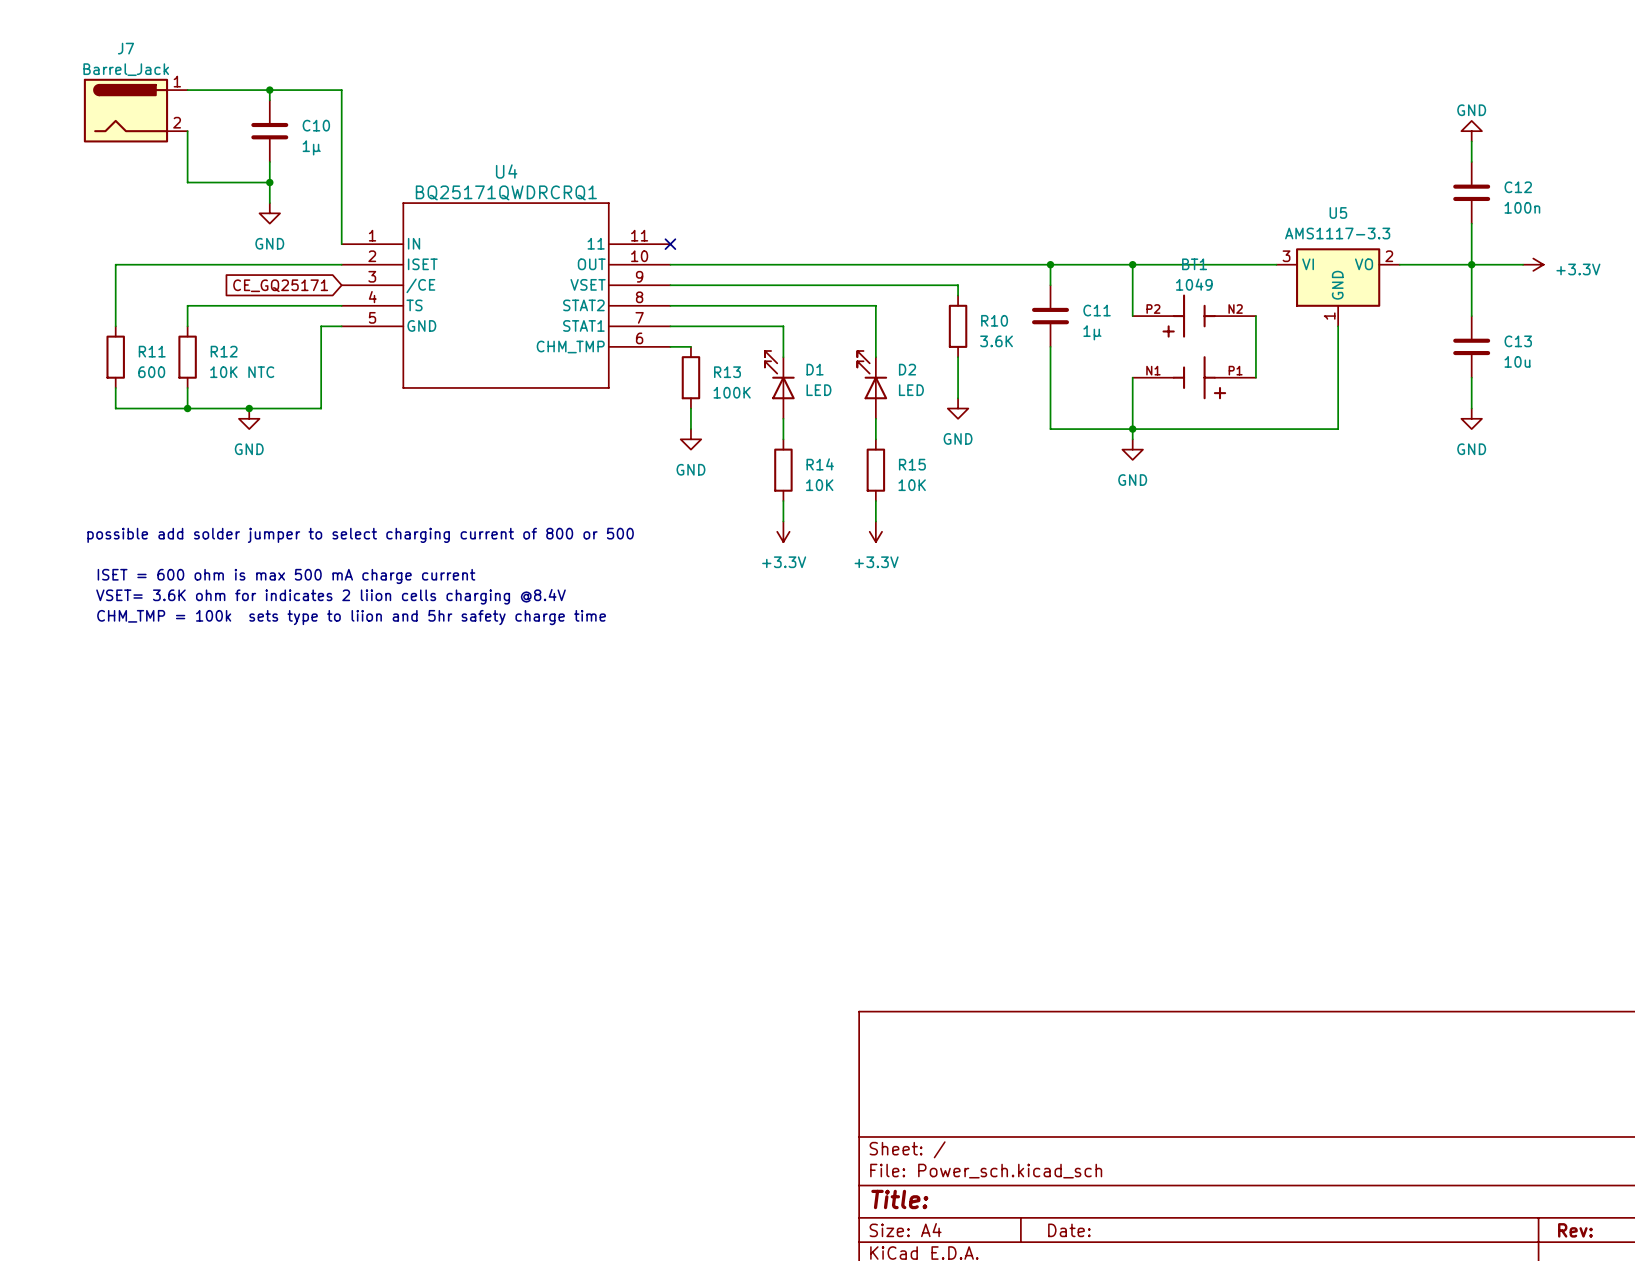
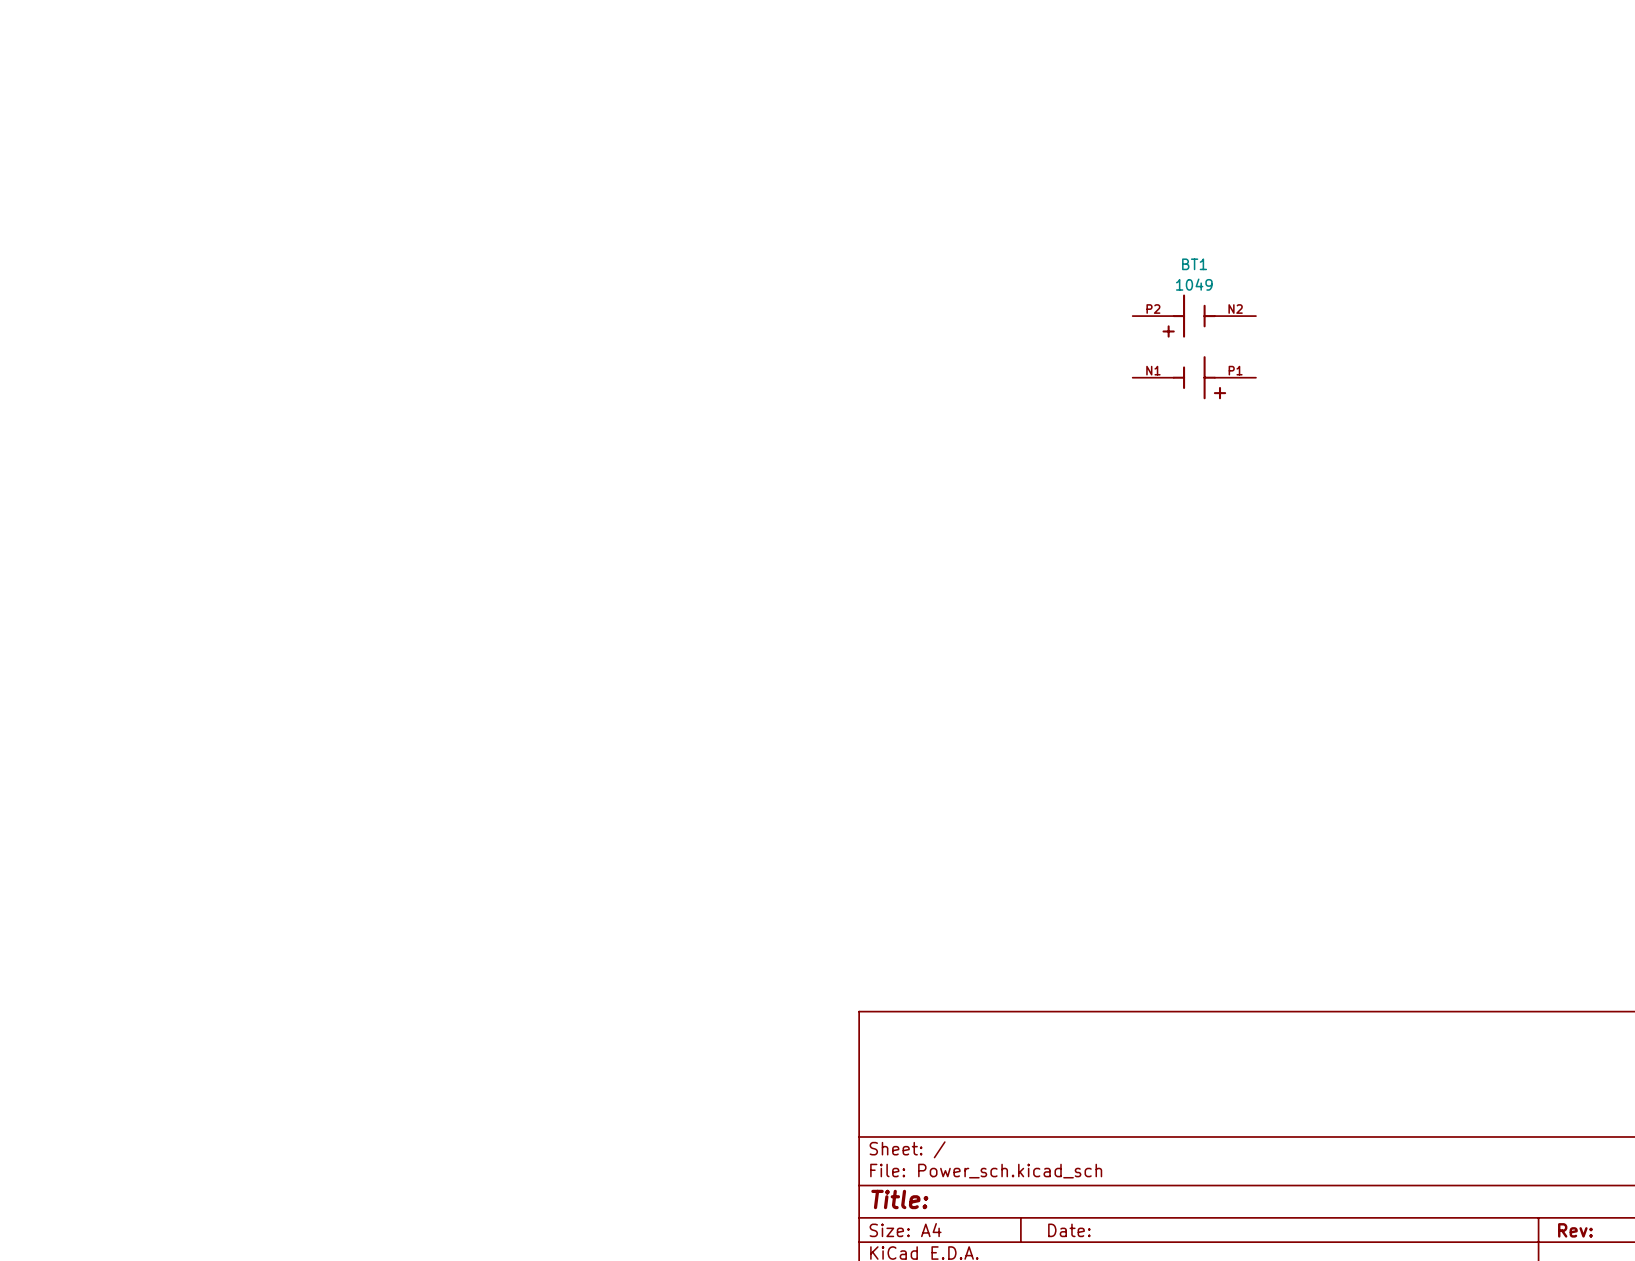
wire: (187, 90) (341, 90) (341, 244) -> none
wire: (269, 90) (269, 100) -> none
junction: (269, 90) -> none
J7: Barrel_Jack (135, 110) -> none
wire: (187, 131) (187, 182) (269, 182) -> none
C10: 1µ (269, 131) -> none
power symbol: GND (1471, 131) -> none
wire: (1471, 141) (1471, 161) -> none
wire: (269, 161) (269, 203) -> none
junction: (269, 182) -> none
C12: 100n (1471, 192) -> none
power symbol: GND (269, 213) -> none
wire: (1471, 223) (1471, 316) -> none
no-connect mark: (670, 244) -> none
wire: (341, 264) (115, 264) (115, 326) -> none
wire: (670, 264) (1276, 264) -> none
wire: (1050, 264) (1050, 285) -> none
junction: (1050, 264) -> none
wire: (1132, 264) (1132, 316) -> none
junction: (1132, 264) -> none
wire: (1399, 264) (1523, 264) -> none
junction: (1471, 264) -> none
power symbol: +3.3V (1533, 264) -> none
global label: CE_GQ25171 (280, 285) -> none
wire: (670, 285) (958, 285) (958, 295) -> none
U5: AMS1117-3.3 (1338, 287) -> none
U4: BQ25171QWDRCRQ1 (506, 295) -> none
wire: (341, 305) (187, 305) (187, 326) -> none
wire: (670, 305) (875, 305) (875, 357) -> none
C11: 1µ (1050, 316) -> none
wire: (1255, 316) (1255, 377) -> none
wire: (341, 326) (321, 326) (321, 408) (115, 408) (115, 387) -> none
wire: (670, 326) (783, 326) (783, 357) -> none
R10: 3.6K (958, 326) -> none
wire: (1338, 326) (1338, 429) (1050, 429) (1050, 346) -> none
wire: (670, 346) (690, 346) -> none
C13: 10u (1471, 346) -> none
R11: 600 (115, 357) -> none
R12: 10K NTC (187, 357) -> none
wire: (958, 357) (958, 398) -> none
R13: 100K (690, 377) -> none
wire: (1132, 377) (1132, 439) -> none
wire: (1471, 377) (1471, 408) -> none
D1: LED (779, 384) -> none
D2: LED (872, 384) -> none
wire: (187, 387) (187, 408) -> none
junction: (187, 408) -> none
junction: (249, 408) -> none
wire: (690, 408) (690, 429) -> none
power symbol: GND (958, 408) -> none
power symbol: GND (249, 418) -> none
wire: (783, 418) (783, 439) -> none
wire: (875, 418) (875, 439) -> none
power symbol: GND (1471, 418) -> none
junction: (1132, 429) -> none
power symbol: GND (690, 439) -> none
power symbol: GND (1132, 449) -> none
R14: 10K (783, 470) -> none
R15: 10K (875, 470) -> none
wire: (783, 500) (783, 521) -> none
wire: (875, 500) (875, 521) -> none
power symbol: +3.3V (783, 531) -> none
power symbol: +3.3V (875, 531) -> none
text: possible add solder jumper to select charging current of 800 or 500 (360, 535) -> none
text: ISET = 600 ohm is max 500 mA charge current (286, 576) -> none
text: VSET= 3.6K ohm for indicates 2 liion cells charging @8.4V (331, 596) -> none
text: CHM_TMP = 100k sets type to liion and 5hr safety charge time (351, 617) -> none

